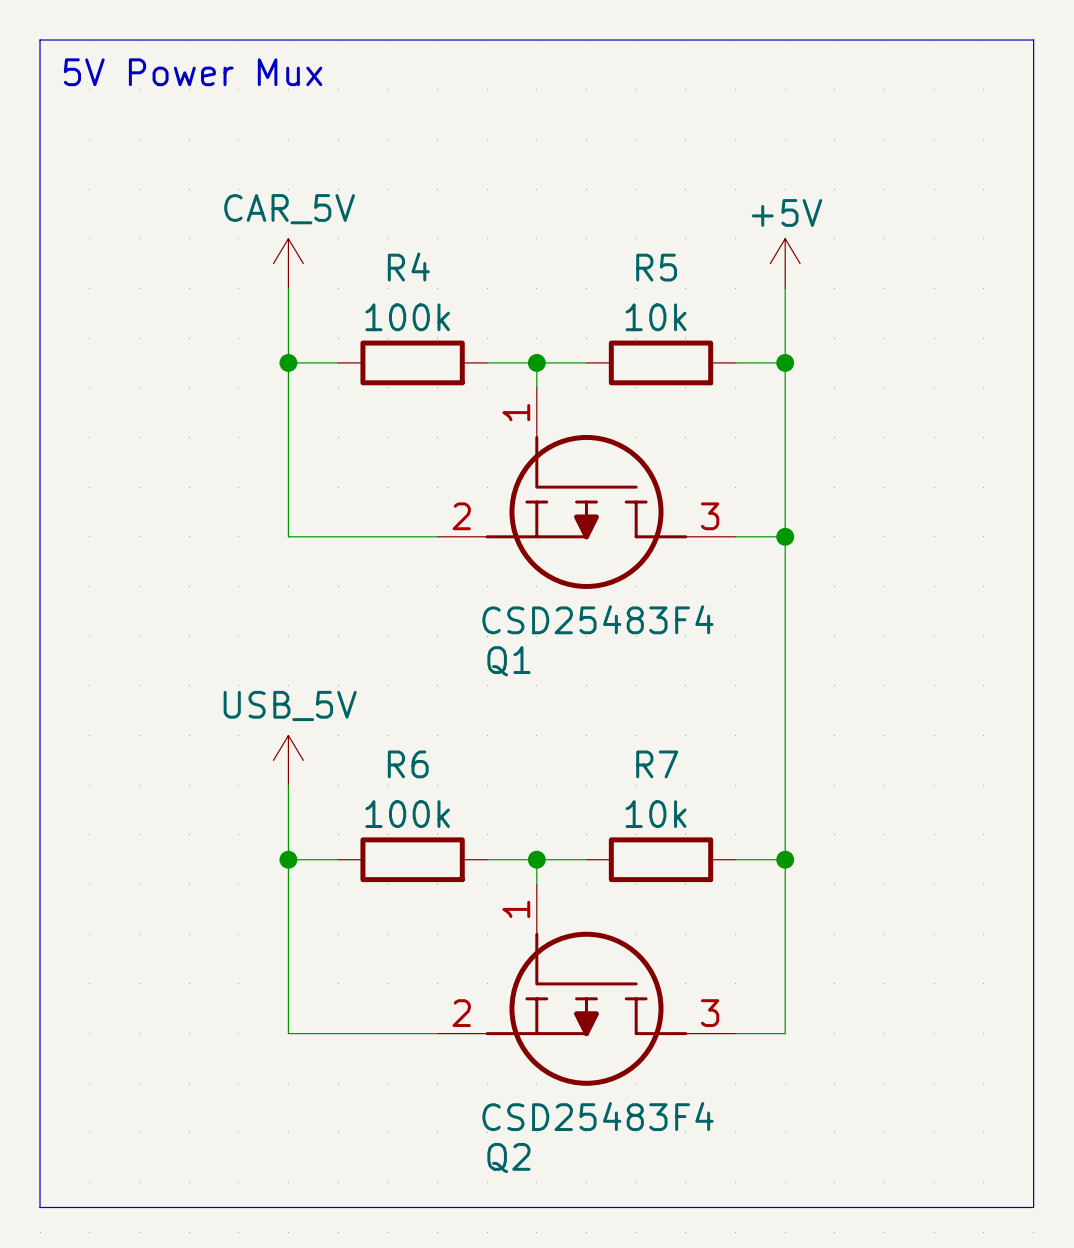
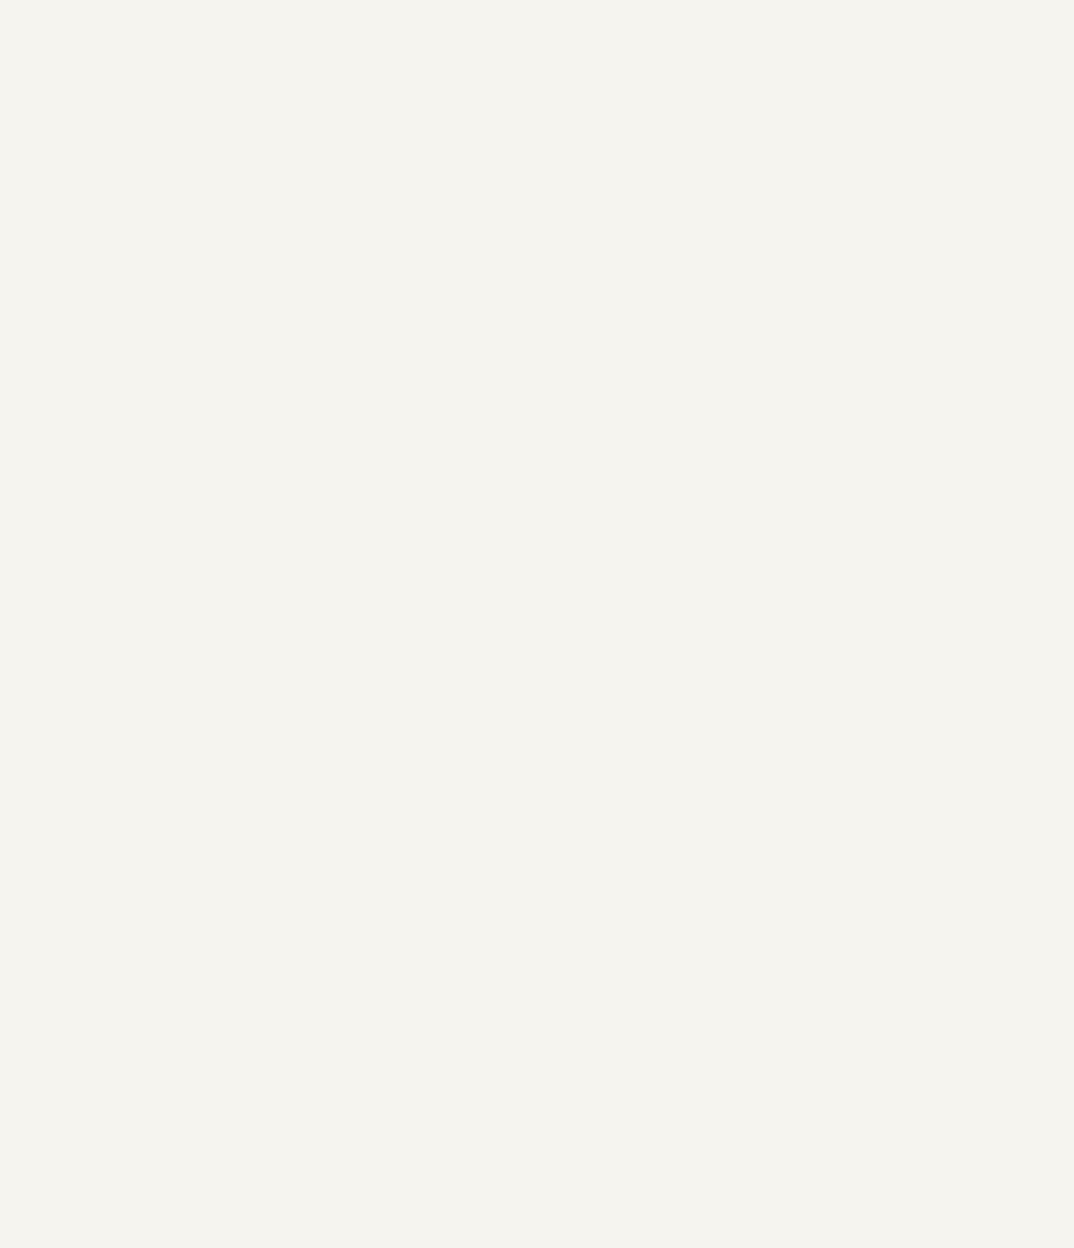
line: (40, 40) (1033, 40) (1033, 1207) (40, 1207) (40, 40) -> none
text: 5V Power Mux (193, 72) -> none
power symbol: CAR_5V (288, 263) -> none
power symbol: +5V (785, 263) -> none
wire: (288, 288) (288, 536) (437, 536) -> none
wire: (785, 288) (785, 1033) (735, 1033) -> none
wire: (288, 362) (338, 362) -> none
junction: (288, 362) -> none
R4: 100k (412, 362) -> none
wire: (487, 362) (586, 362) -> none
wire: (536, 362) (536, 387) -> none
junction: (536, 362) -> none
R5: 10k (661, 362) -> none
wire: (735, 362) (785, 362) -> none
junction: (785, 362) -> none
Q1: CSD25483F4 (586, 488) -> none
wire: (735, 536) (785, 536) -> none
junction: (785, 536) -> none
power symbol: USB_5V (288, 760) -> none
wire: (288, 785) (288, 1033) (437, 1033) -> none
wire: (288, 859) (338, 859) -> none
junction: (288, 859) -> none
R6: 100k (412, 859) -> none
wire: (487, 859) (586, 859) -> none
wire: (536, 859) (536, 884) -> none
junction: (536, 859) -> none
R7: 10k (661, 859) -> none
wire: (735, 859) (785, 859) -> none
junction: (785, 859) -> none
Q2: CSD25483F4 (586, 985) -> none

